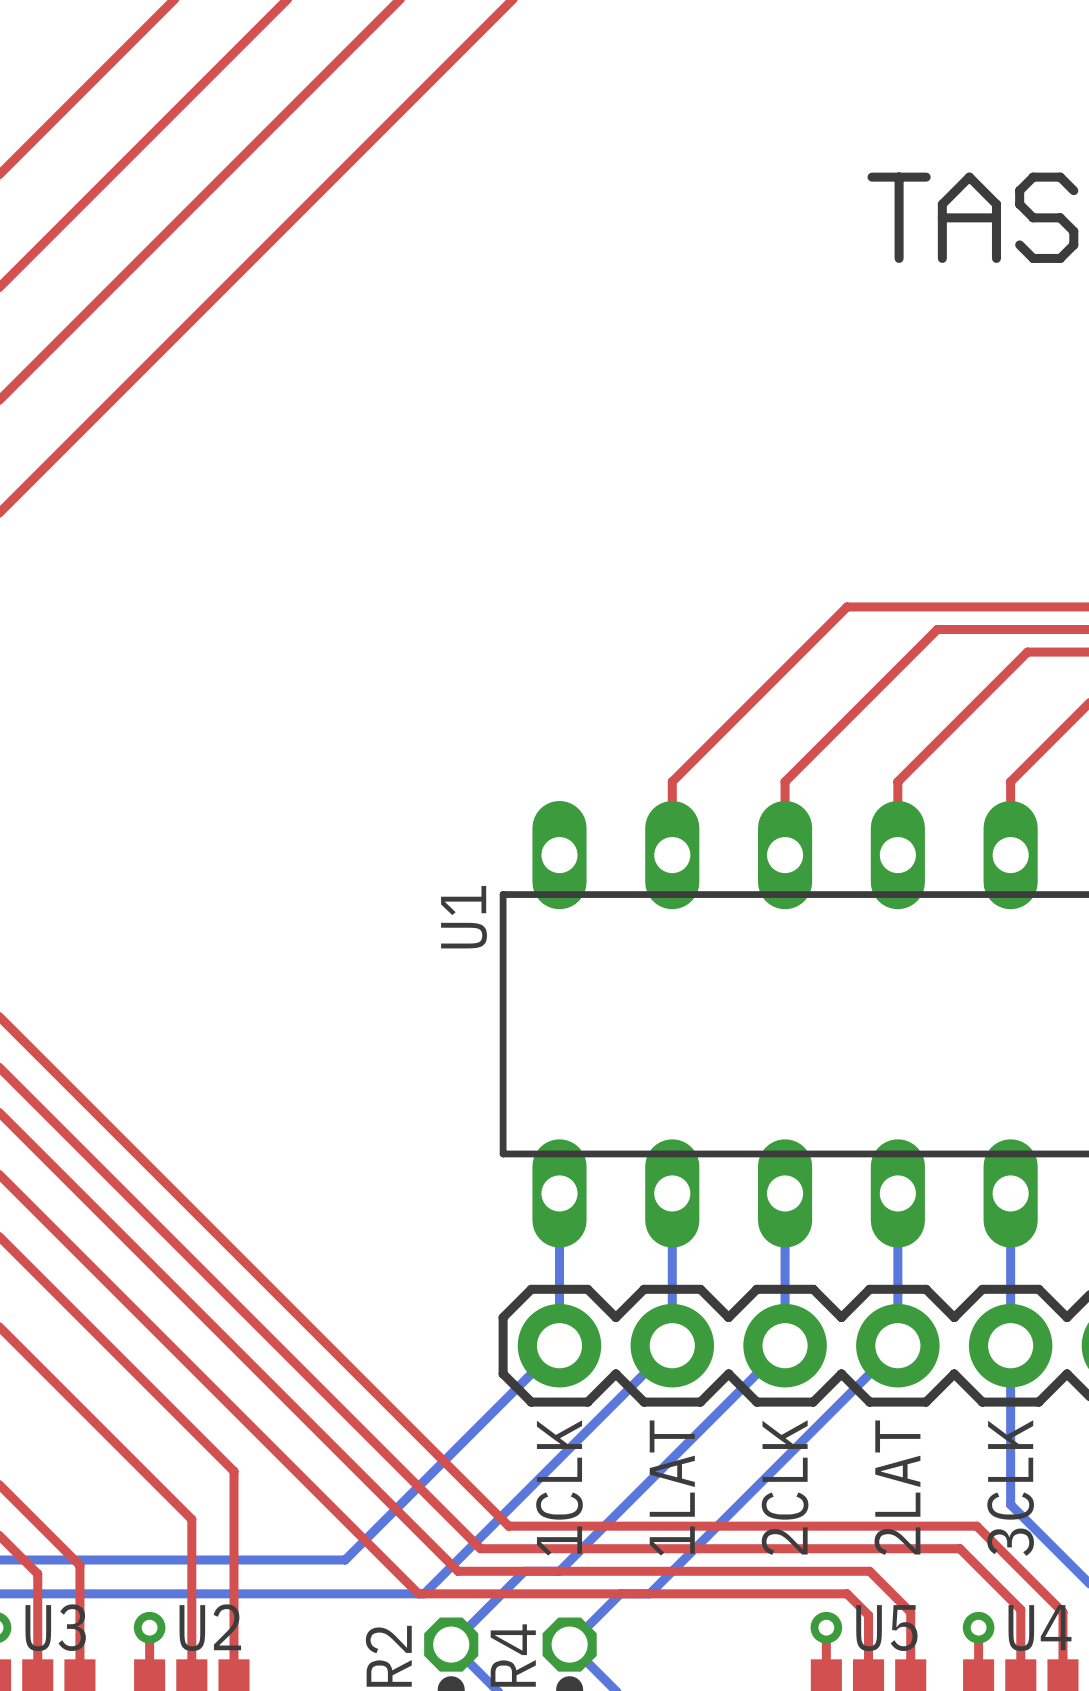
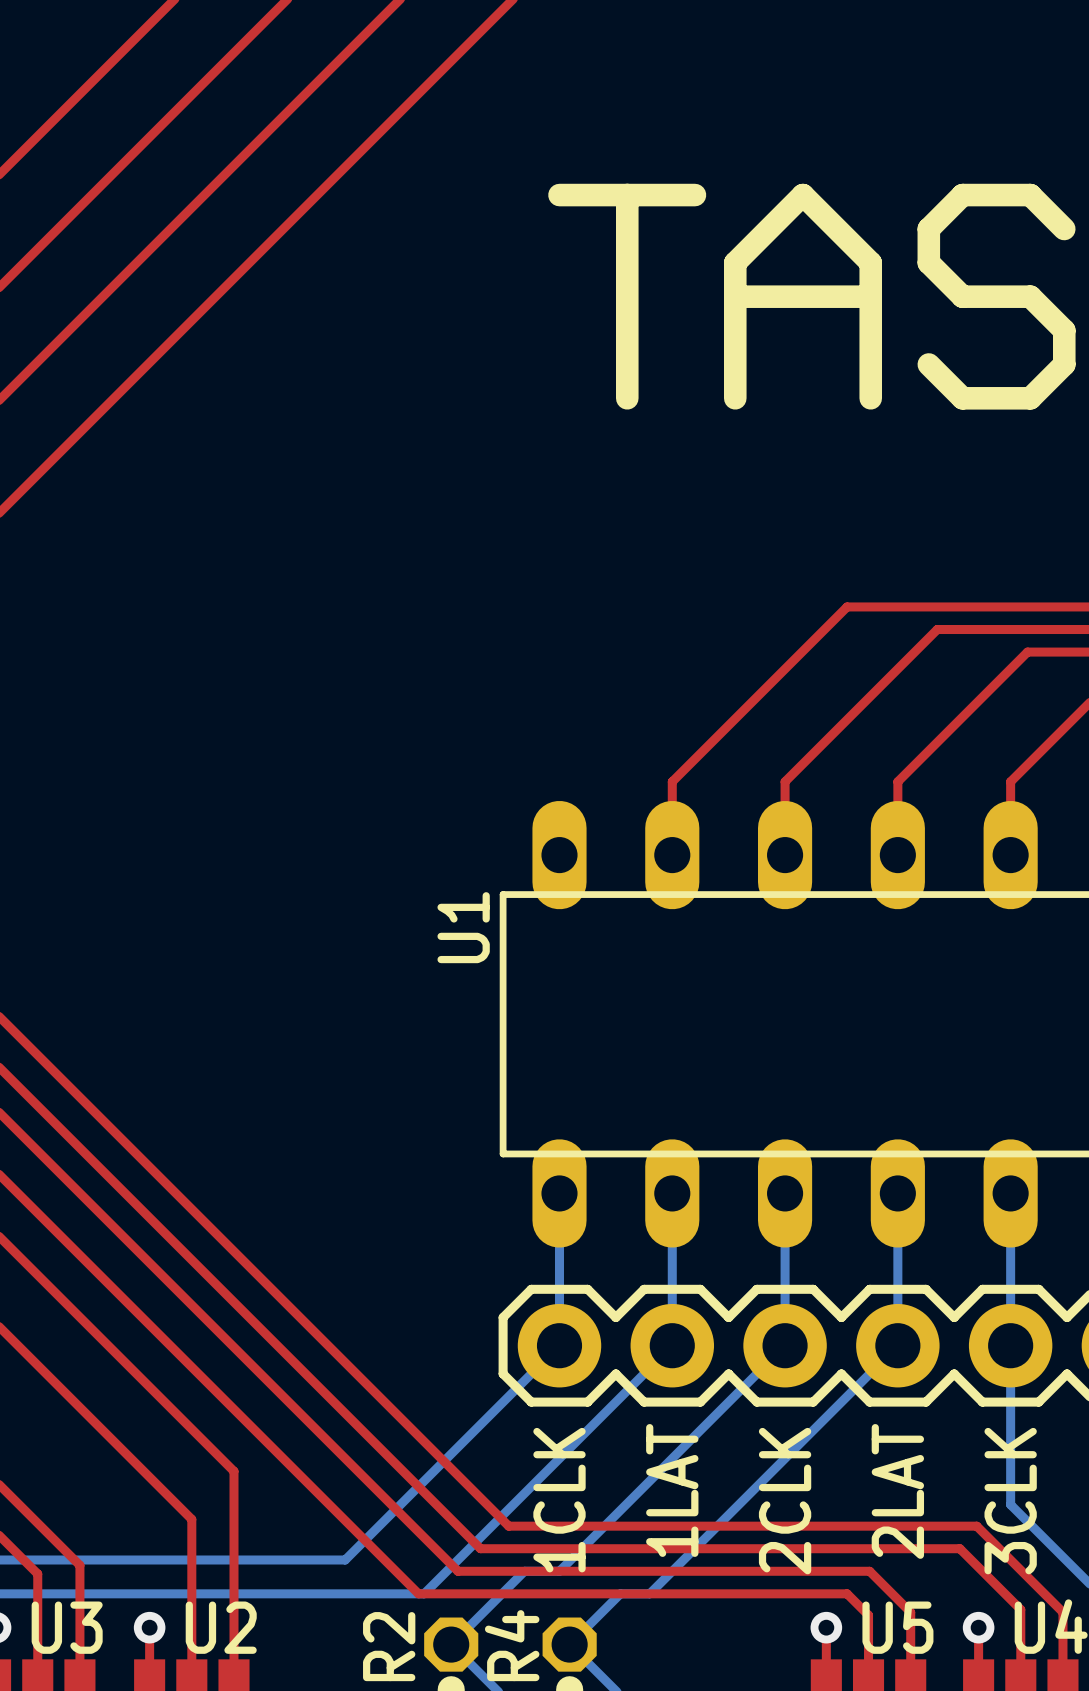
line: (872, 177) (926, 177) -> none
line: (899, 177) (899, 258) -> none
line: (1073, 190) (1060, 177) (1033, 177) (1019, 190) (1019, 204) (1033, 217) (1060, 217) (1073, 231) (1073, 244) (1060, 258) (1033, 258) (1019, 244) -> none
line: none -> (559, 195) (694, 195)
line: none -> (627, 195) (627, 398)
line: (942, 217) (996, 217) -> none
line: none -> (1064, 229) (1030, 195) (962, 195) (928, 229) (928, 262) (962, 296) (1030, 296) (1064, 330) (1064, 364) (1030, 398) (962, 398) (928, 364)
line: (942, 258) (942, 204) (969, 177) (996, 204) (996, 258) -> none
line: none -> (735, 296) (870, 296)
line: none -> (735, 398) (735, 262) (802, 195) (870, 262) (870, 398)

